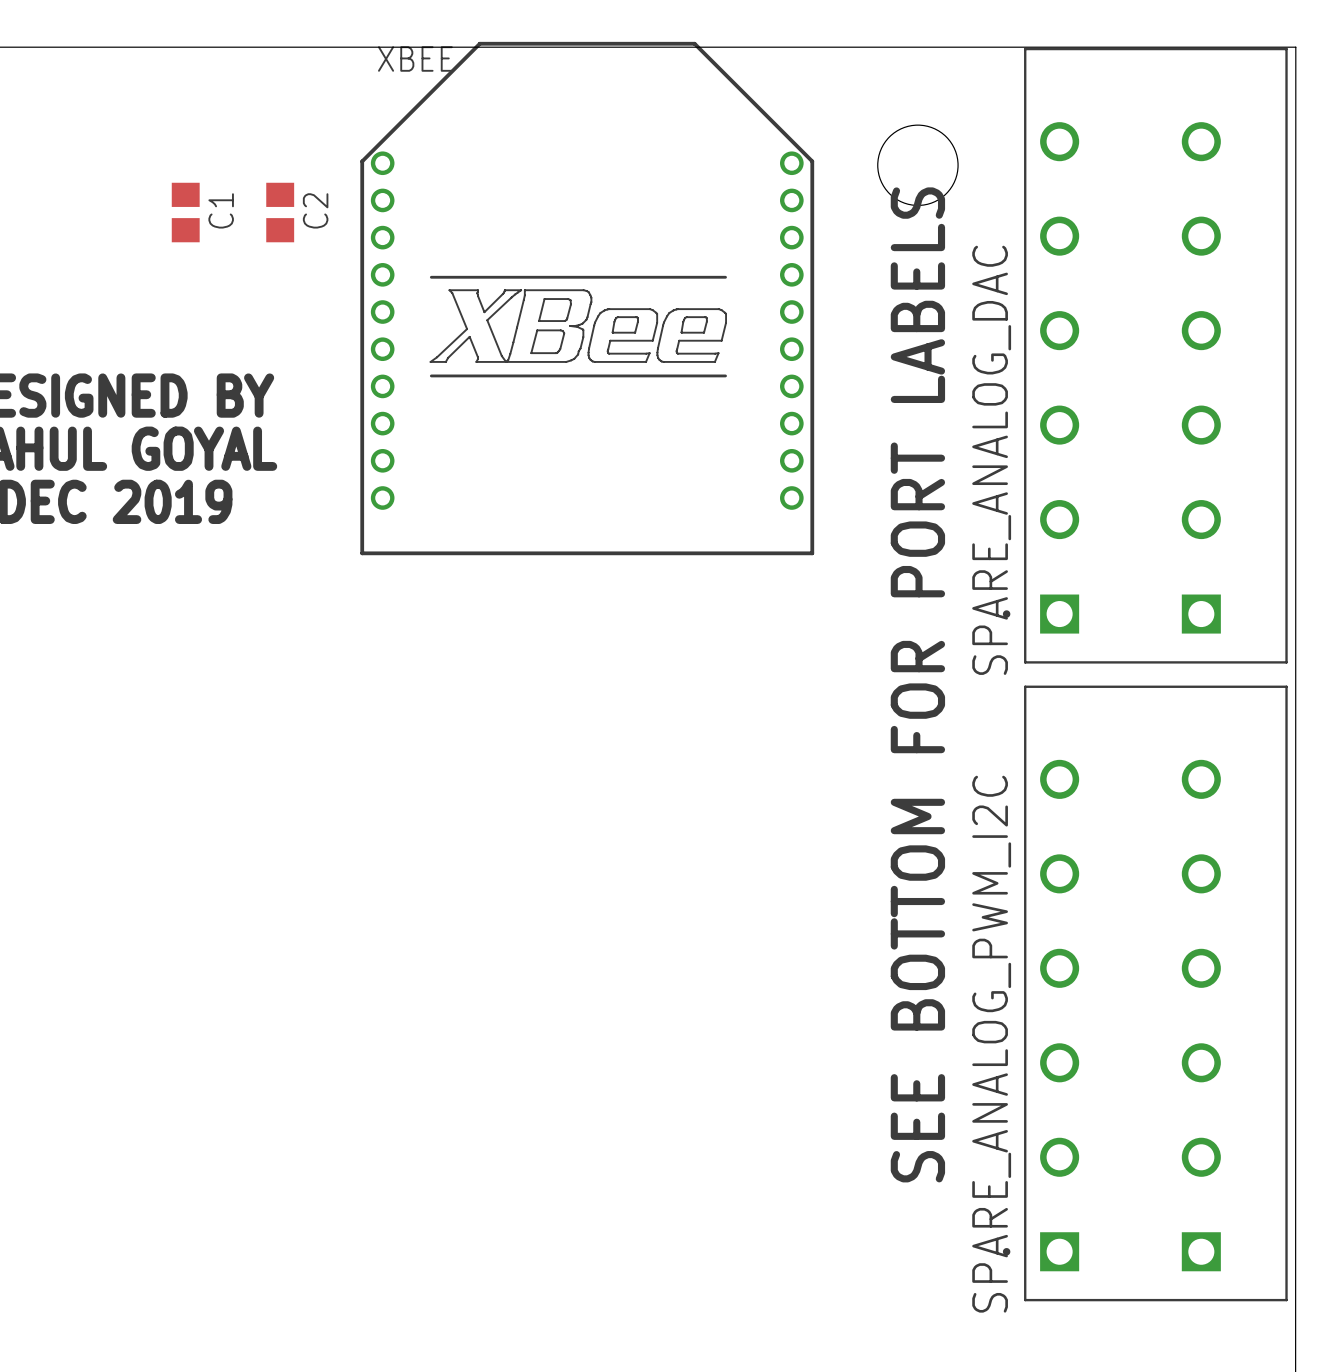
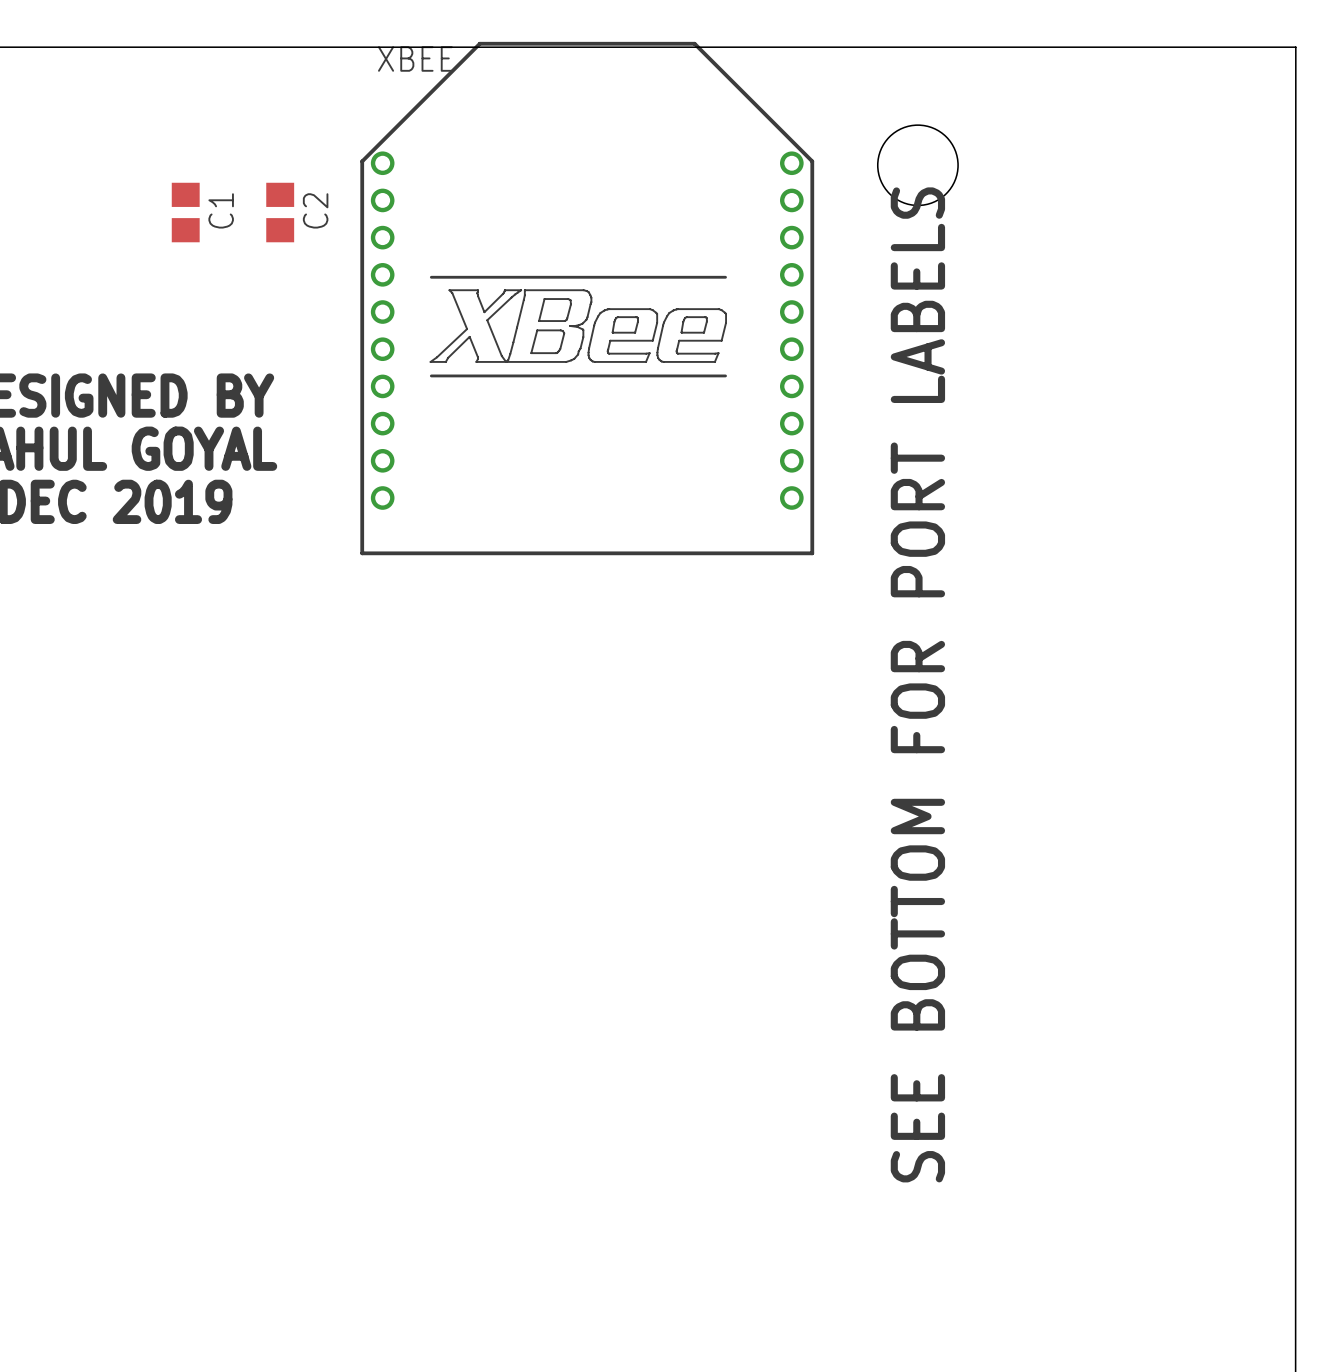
SPARE_ANALOG_DAC: (1145, 355) -> none
SPARE_ANALOG_PWM_I2C: (1145, 993) -> none

